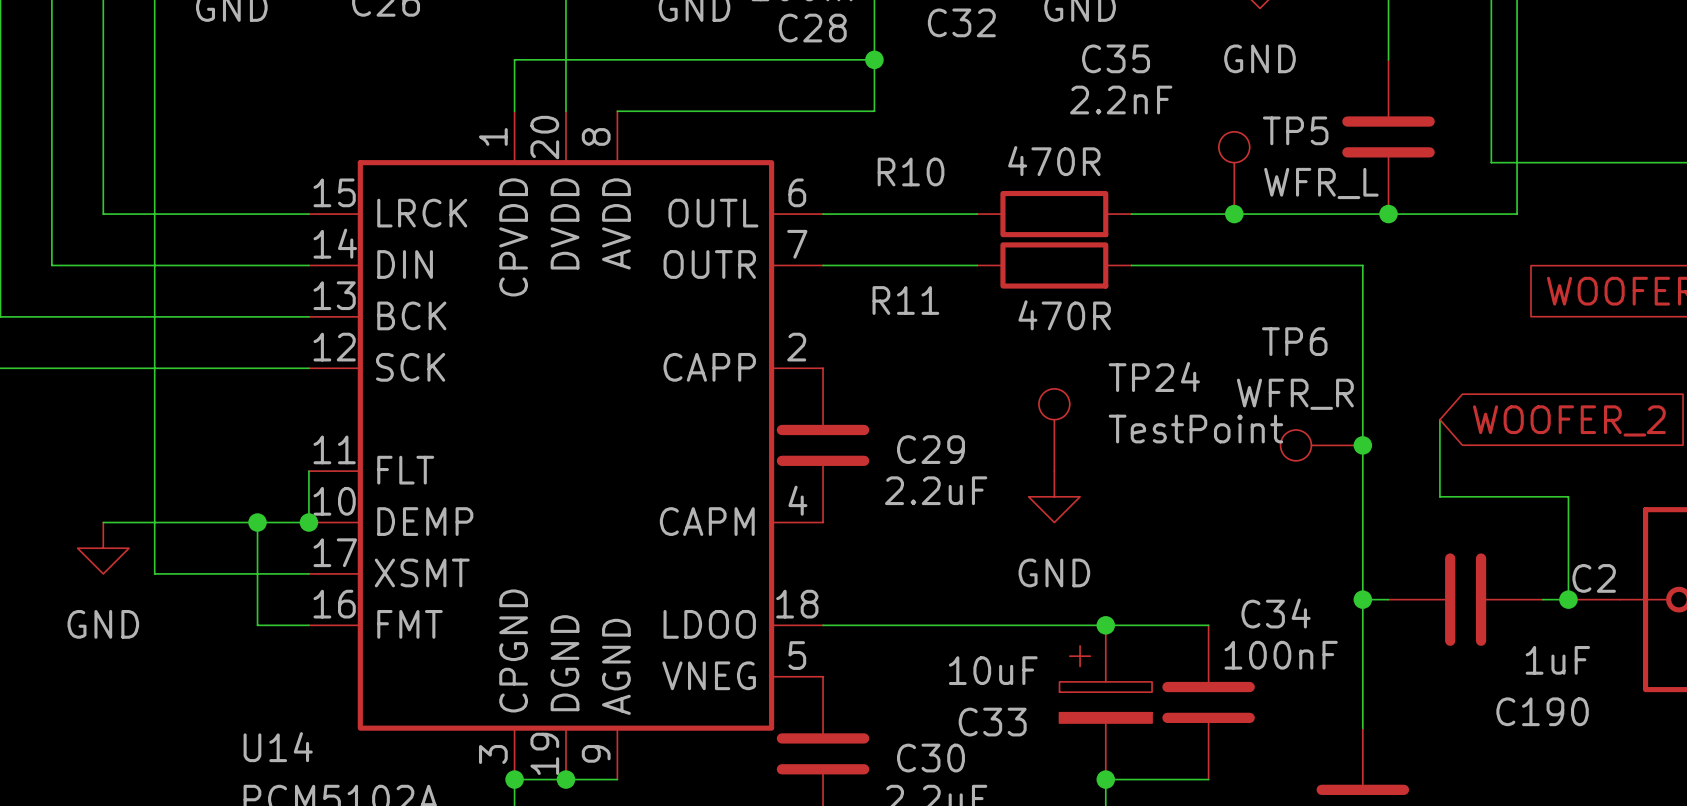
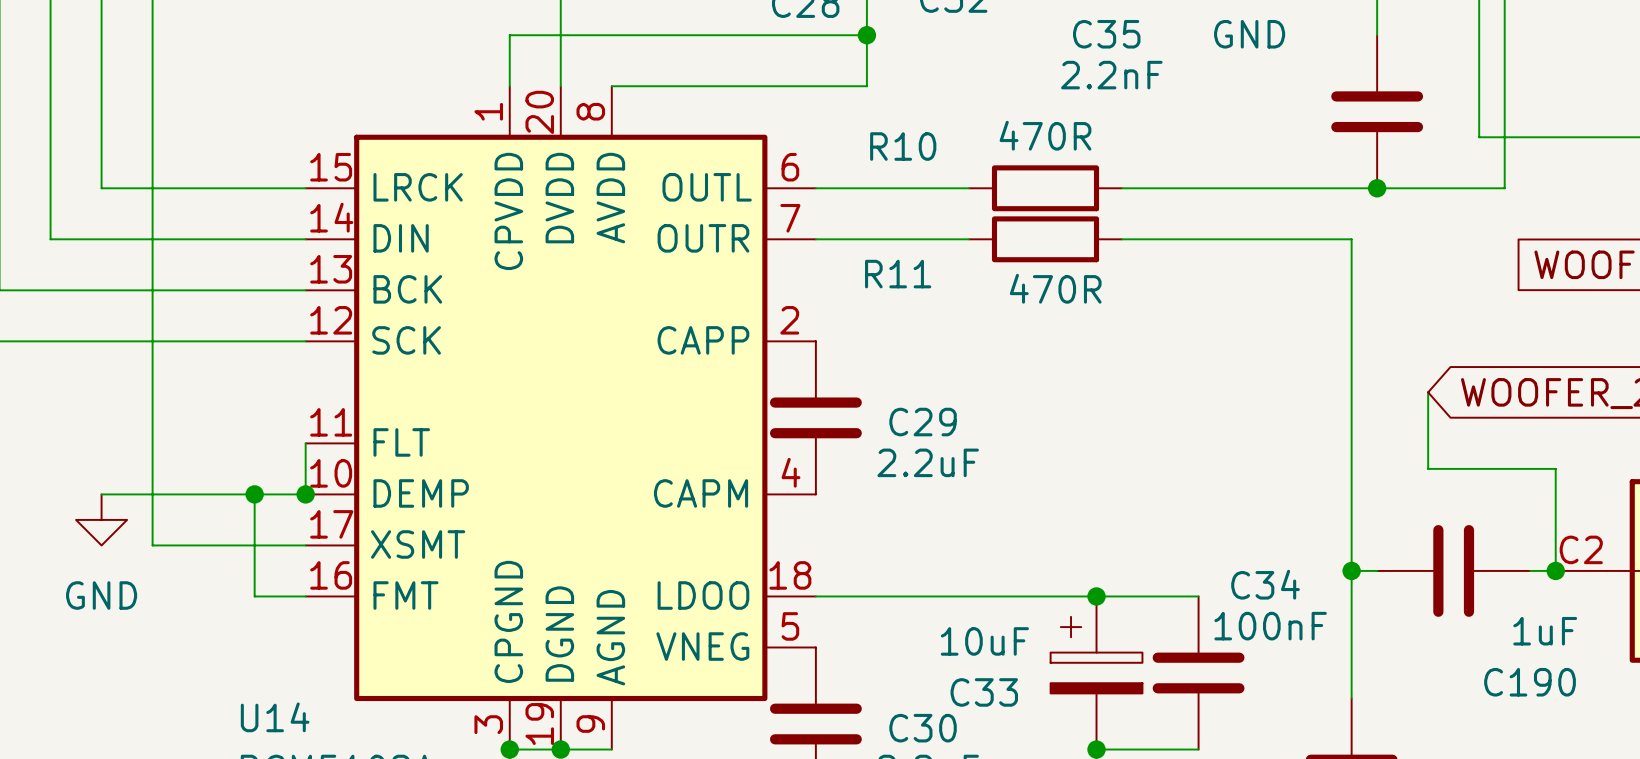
TP5: WFR_L (1234, 172) -> none
junction: (1234, 214) -> none
TP24: TestPoint (1054, 429) -> none
TP6: WFR_R (1321, 445) -> none
junction: (1362, 445) -> none
power symbol: GND (1054, 496) -> none

